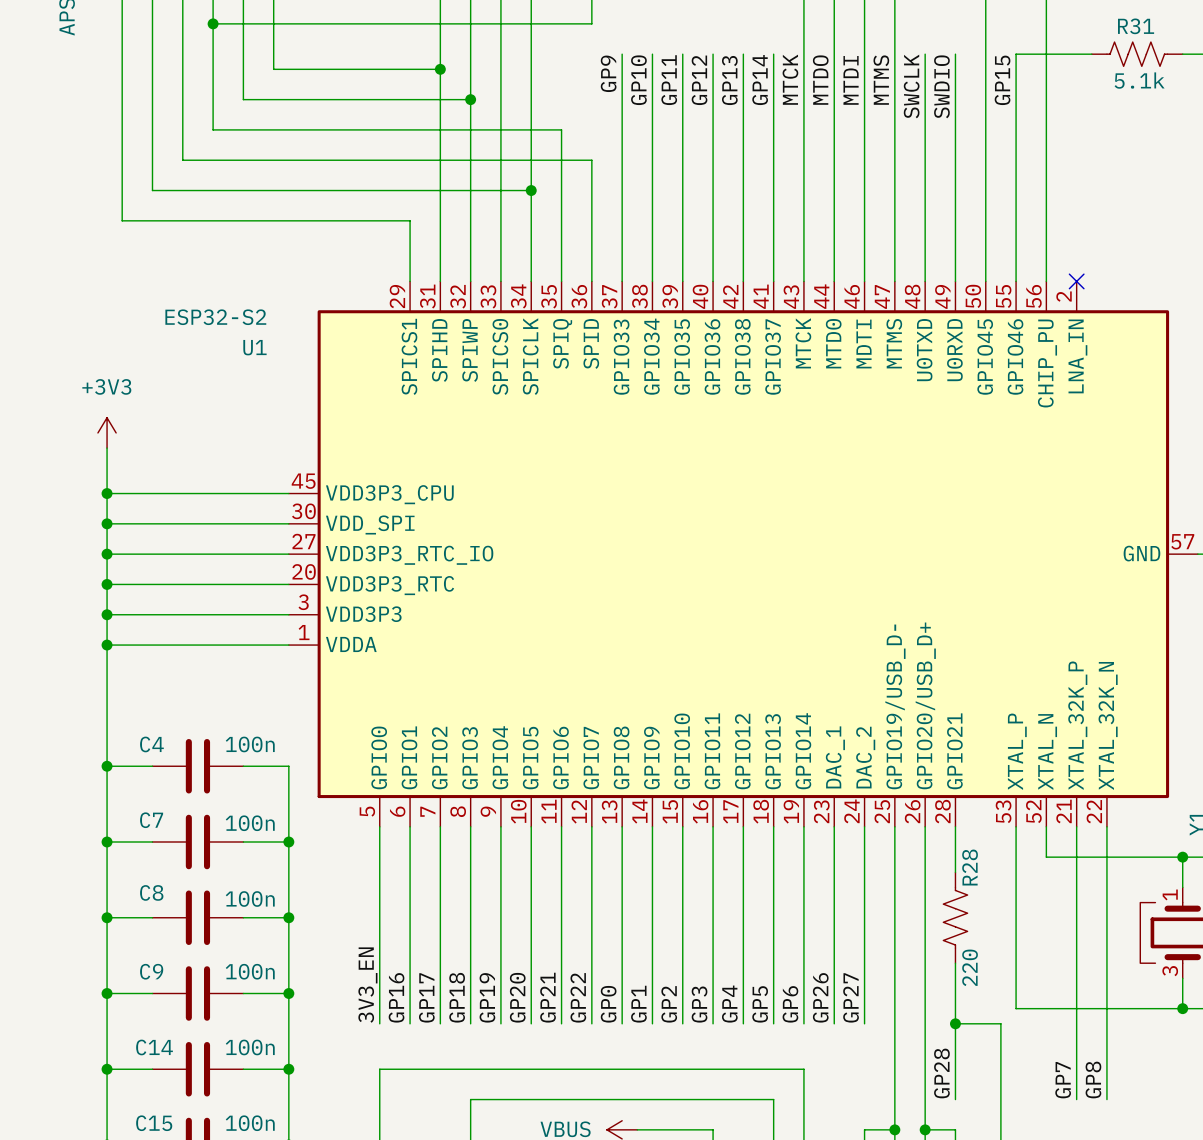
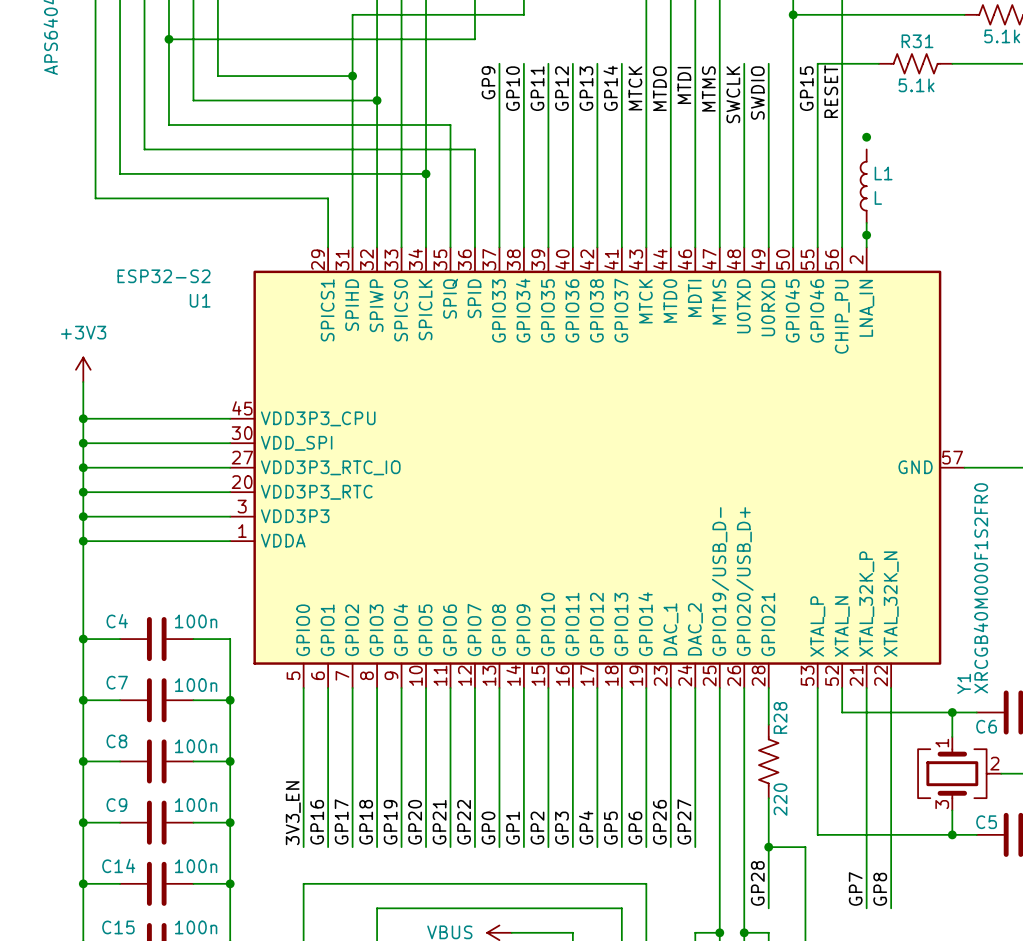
label: none -> RESET (831, 91)
junction: none -> (866, 137)
L1: none -> L (863, 186)
wire: none -> (866, 222) (866, 247)
junction: none -> (866, 235)
no-connect mark: (1076, 281) -> none

